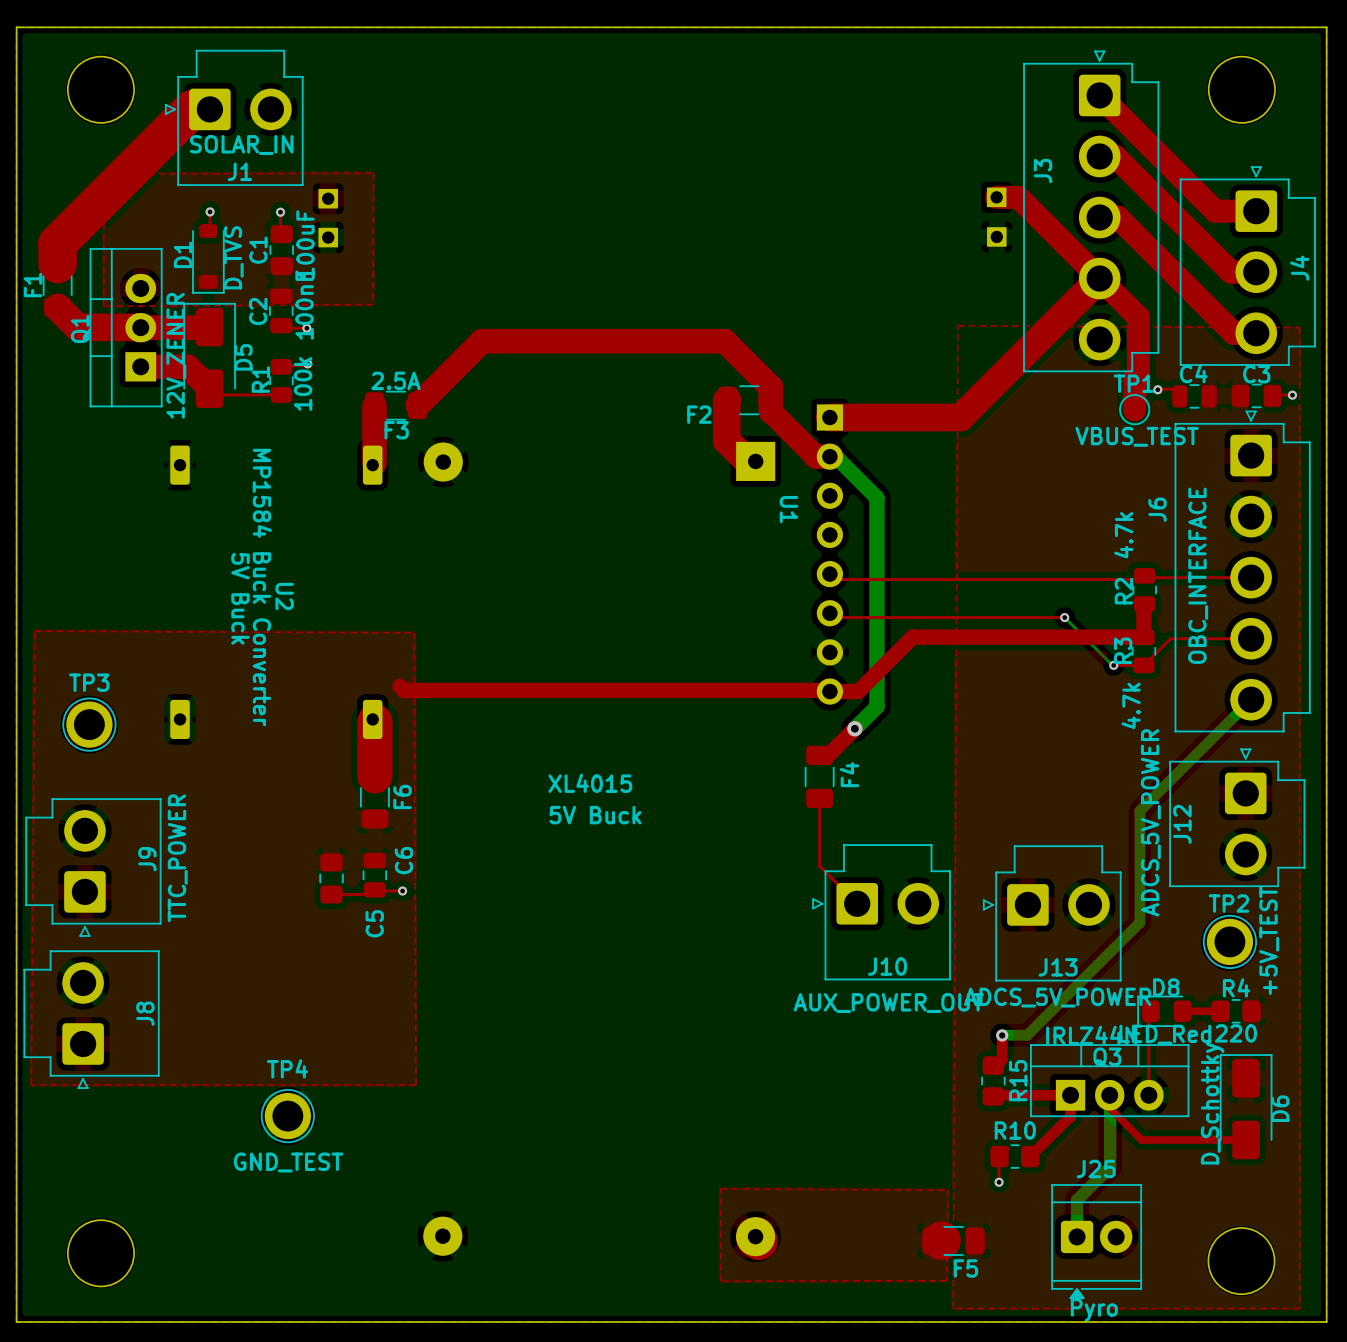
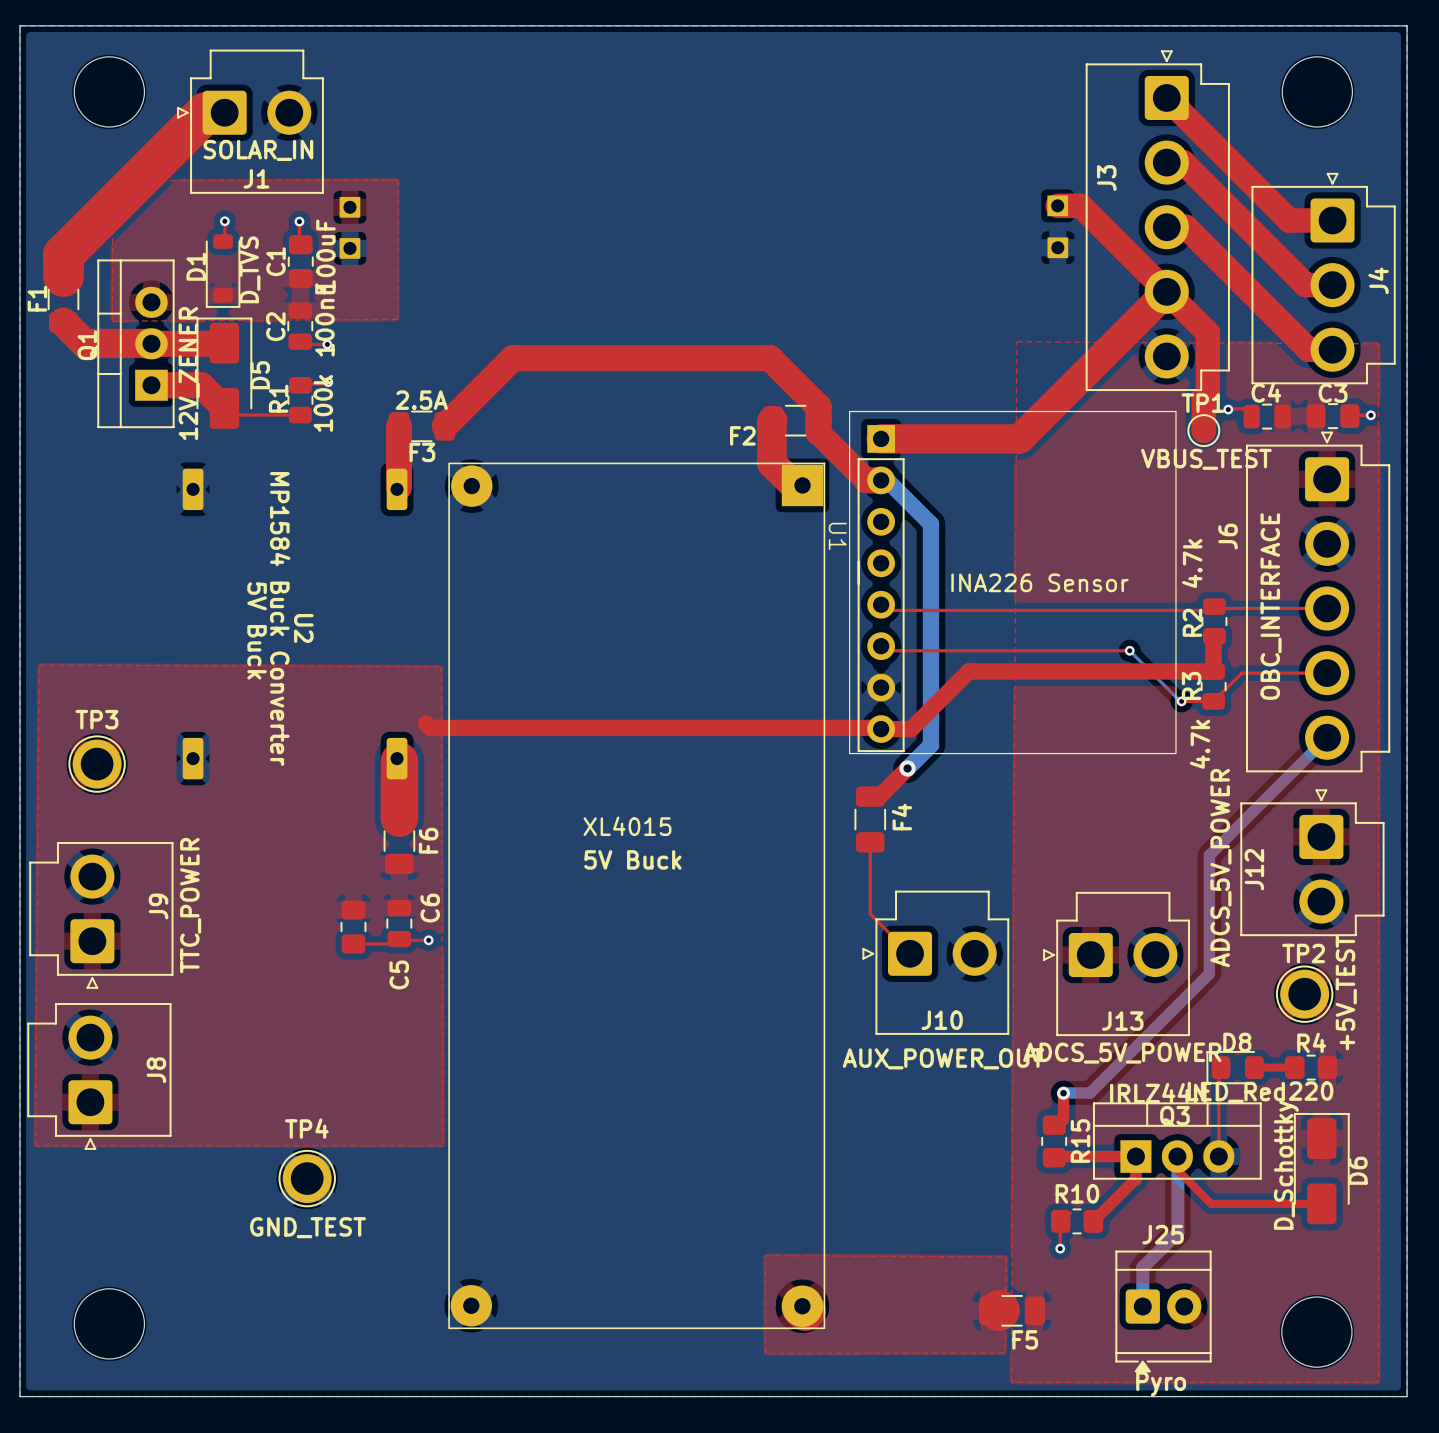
U1 footprint: [423, 441, 776, 1257] -> [448, 462, 826, 1330]
part: none -> (1012, 582)

